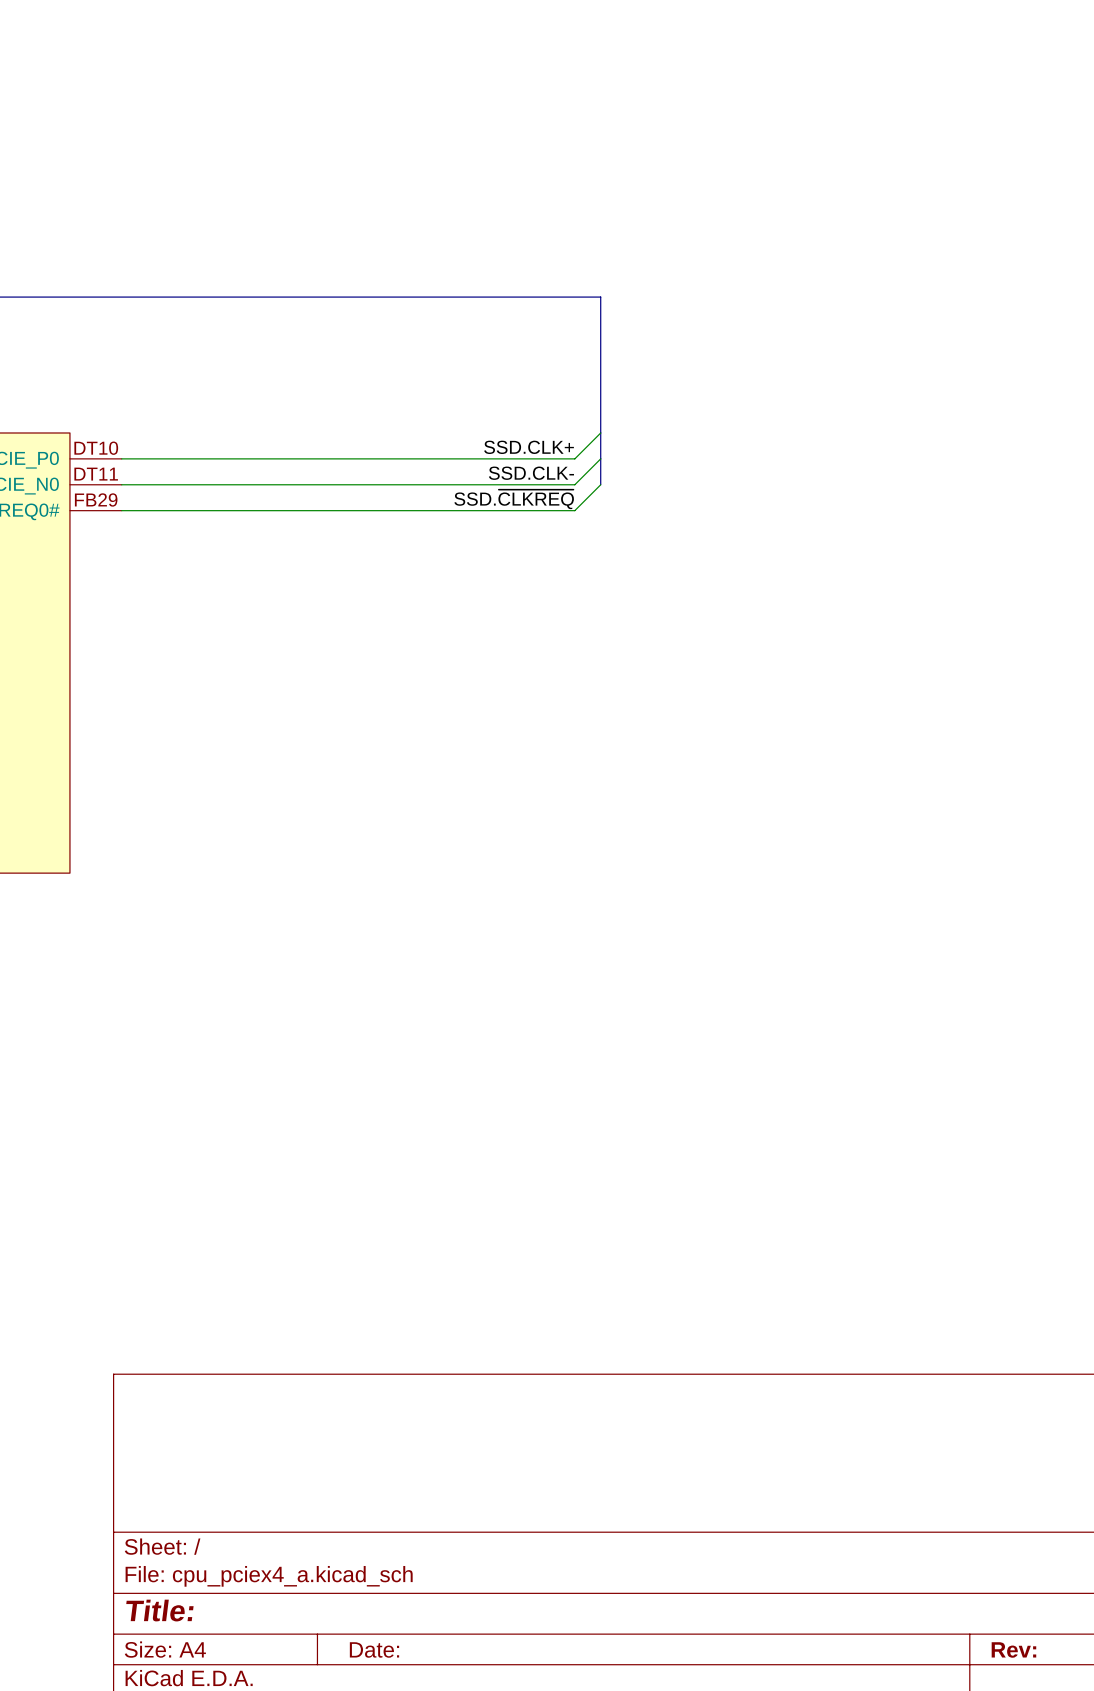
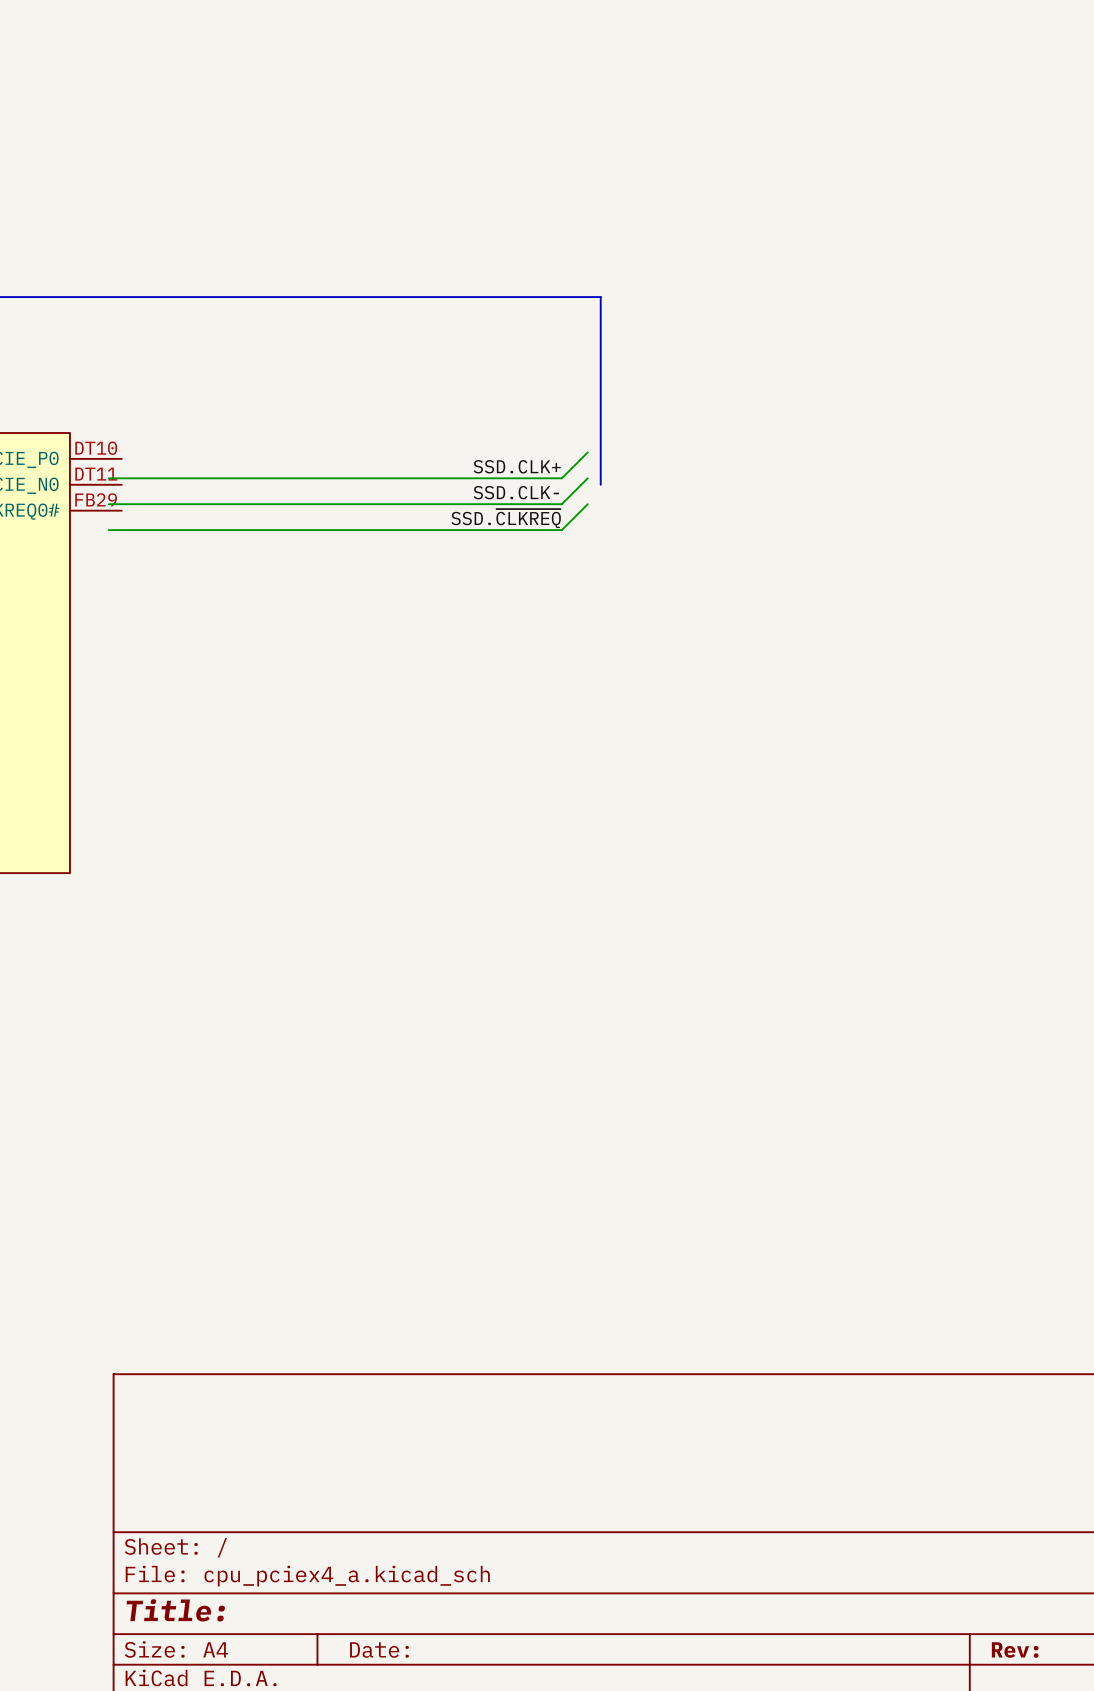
wire: (600, 432) (574, 458) (121, 458) -> (587, 452) (561, 478) (108, 478)
label position: SSD.CLK+ (529, 447) -> SSD.CLK+ (517, 466)
wire: (600, 458) (574, 484) (121, 484) -> none
label position: SSD.CLK- (531, 473) -> SSD.CLK- (516, 492)
wire: none -> (587, 478) (561, 504)
wire: (600, 484) (574, 510) (121, 510) -> (587, 504) (561, 530) (108, 530)
label position: SSD.~{CLKREQ} (514, 499) -> SSD.~{CLKREQ} (506, 518)
wire: none -> (108, 504) (561, 504)

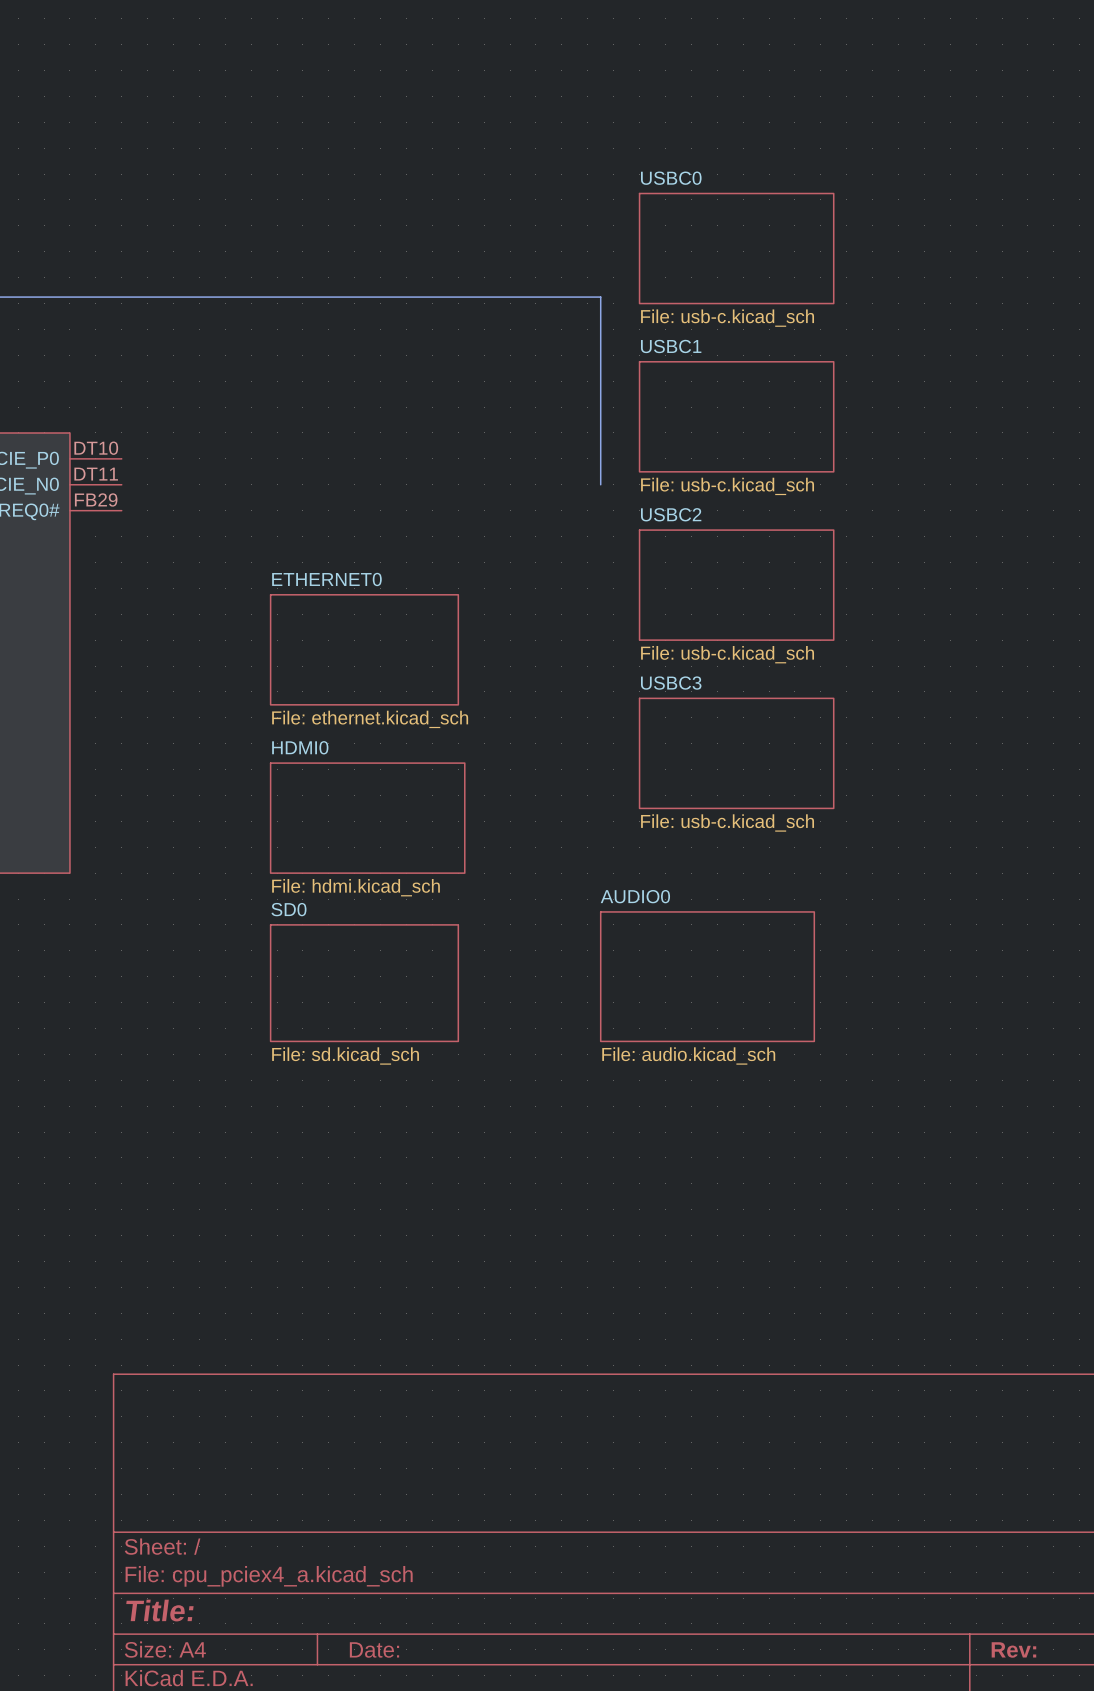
sheet USBC0: none -> File: usb-c.kicad_sch (736, 248)
sheet USBC1: none -> File: usb-c.kicad_sch (736, 416)
wire: (587, 452) (561, 478) (108, 478) -> none
label: SSD.CLK+ (517, 466) -> none
wire: (587, 478) (561, 504) -> none
label: SSD.CLK- (516, 492) -> none
wire: (108, 504) (561, 504) -> none
wire: (587, 504) (561, 530) (108, 530) -> none
label: SSD.~{CLKREQ} (506, 518) -> none
sheet USBC2: none -> File: usb-c.kicad_sch (736, 585)
sheet ETHERNET0: none -> File: ethernet.kicad_sch (364, 649)
sheet USBC3: none -> File: usb-c.kicad_sch (736, 753)
sheet HDMI0: none -> File: hdmi.kicad_sch (367, 818)
sheet AUDIO0: none -> File: audio.kicad_sch (707, 976)
sheet SD0: none -> File: sd.kicad_sch (364, 983)

